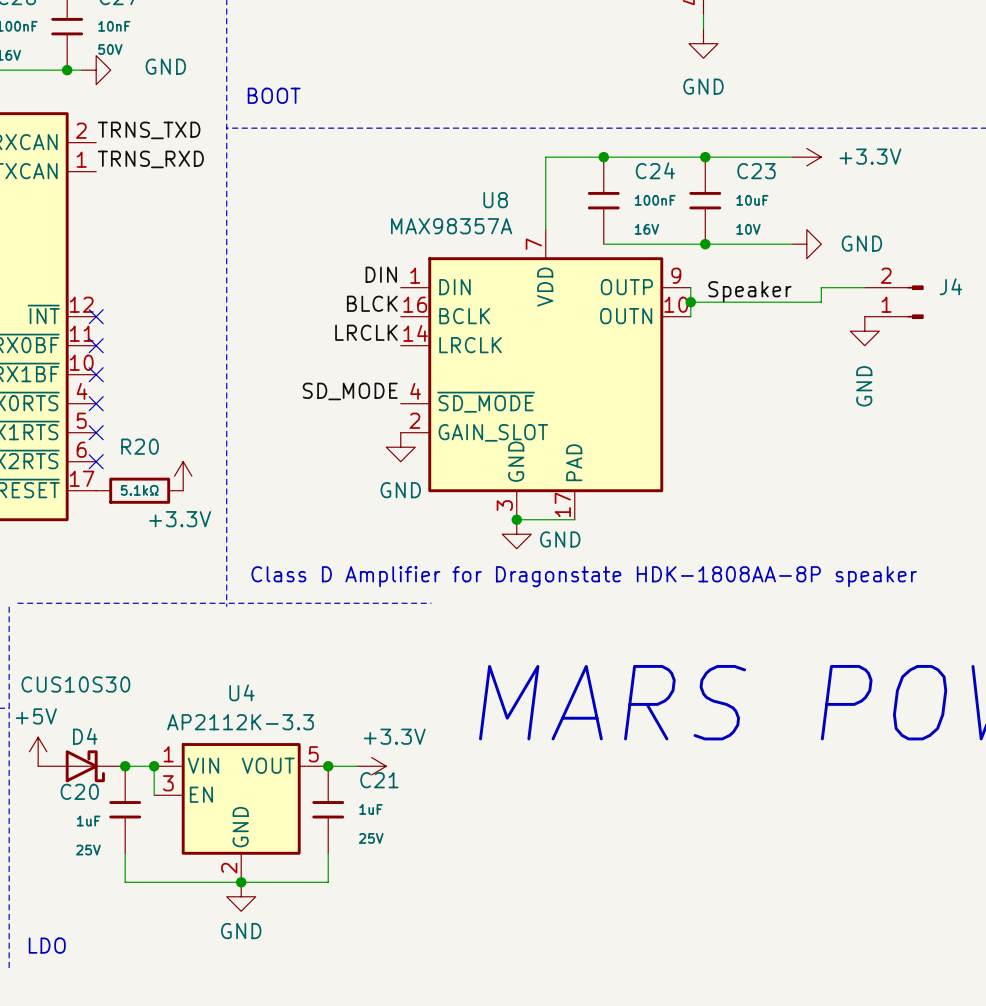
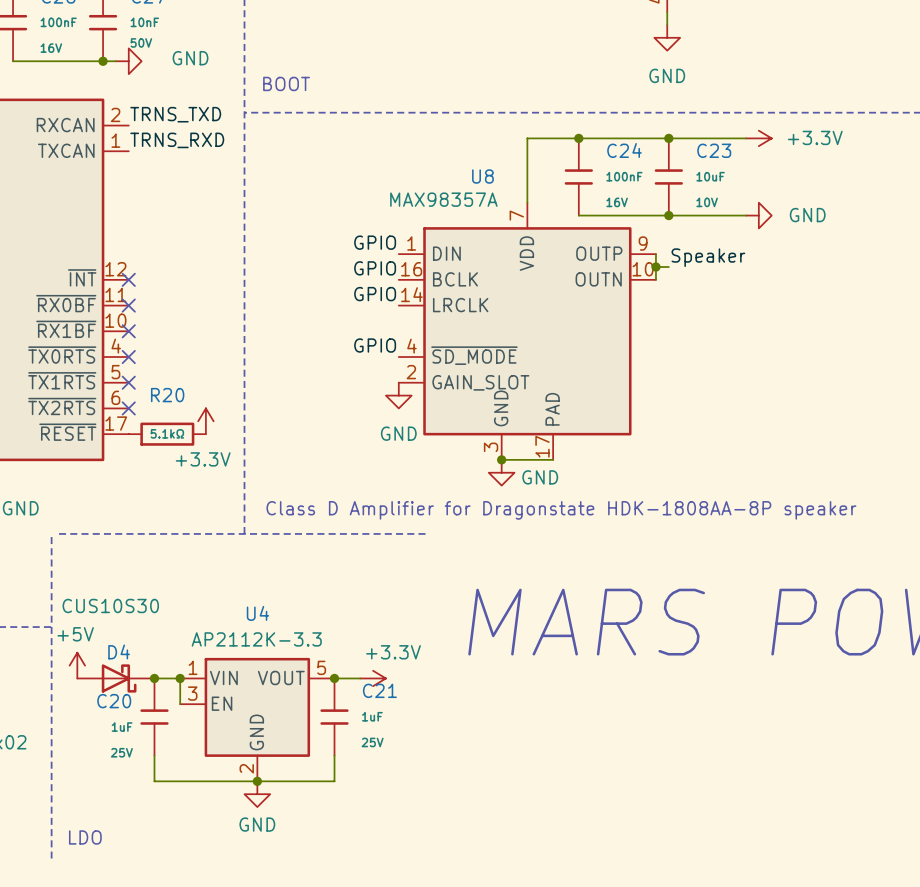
label: DIN (381, 274) -> GPIO (375, 242)
wire: (864, 287) (821, 287) (821, 302) (705, 302) -> none
J4: (894, 302) -> none
label: BLCK (372, 303) -> GPIO (375, 268)
power symbol: GND (864, 331) -> none
label: LRCLK (366, 332) -> GPIO (375, 294)
label: SD_MODE (350, 391) -> GPIO (375, 345)

